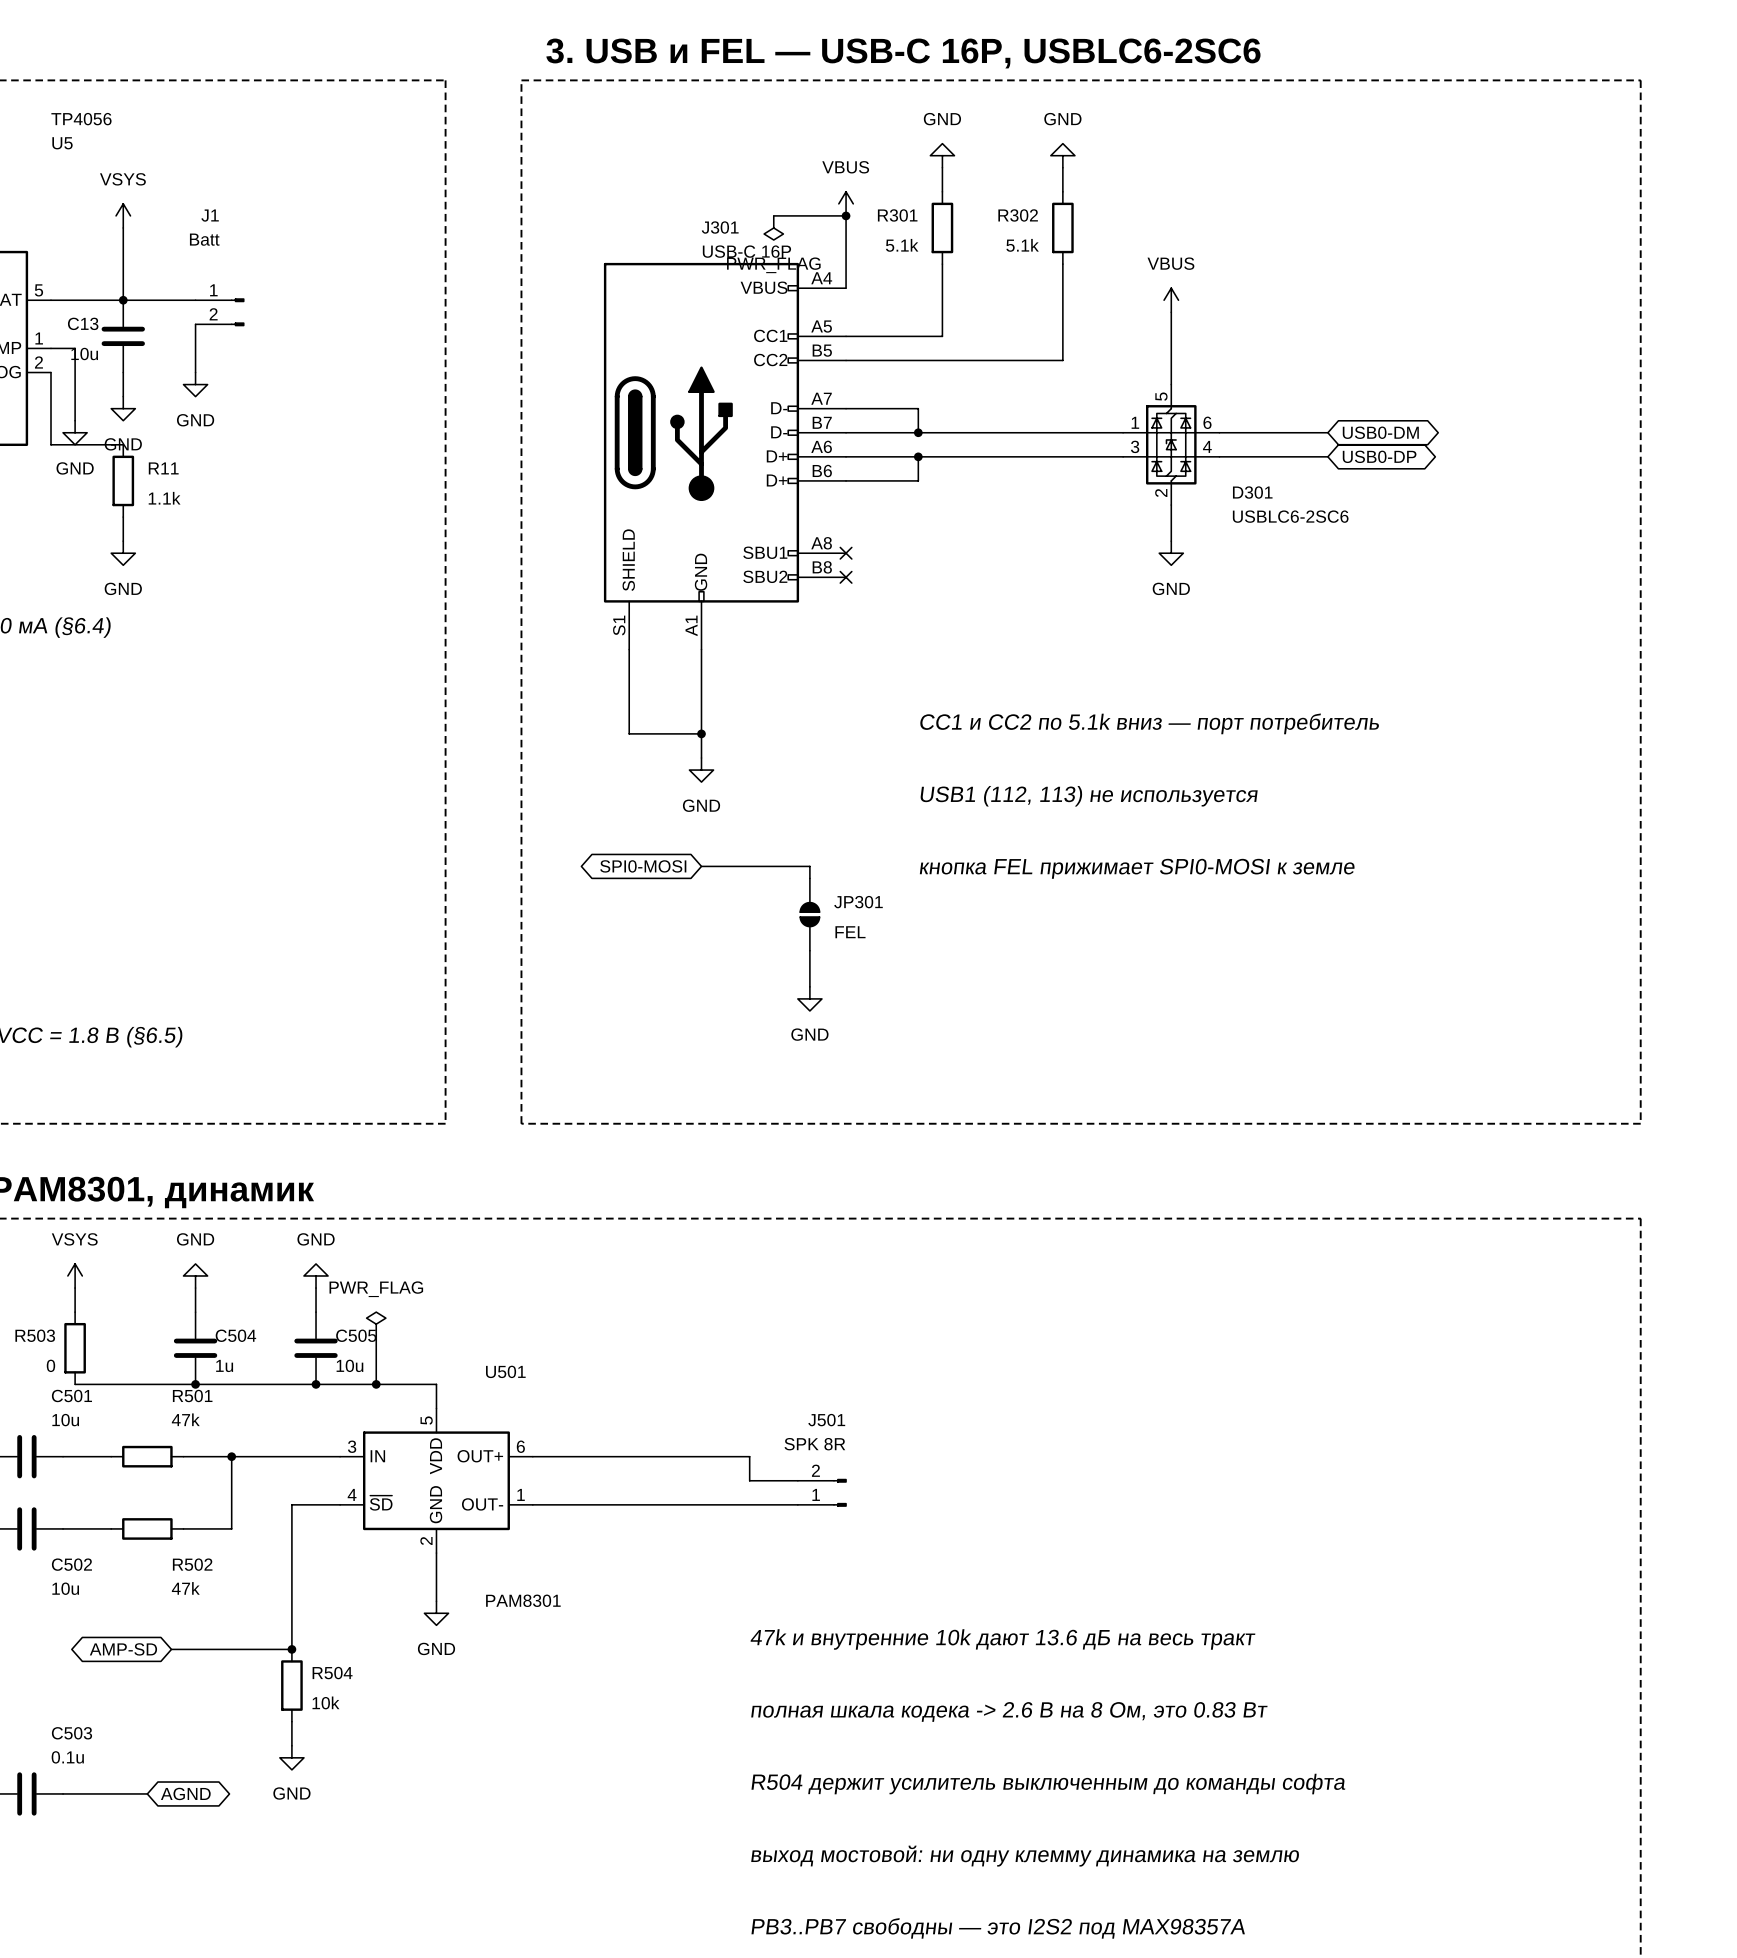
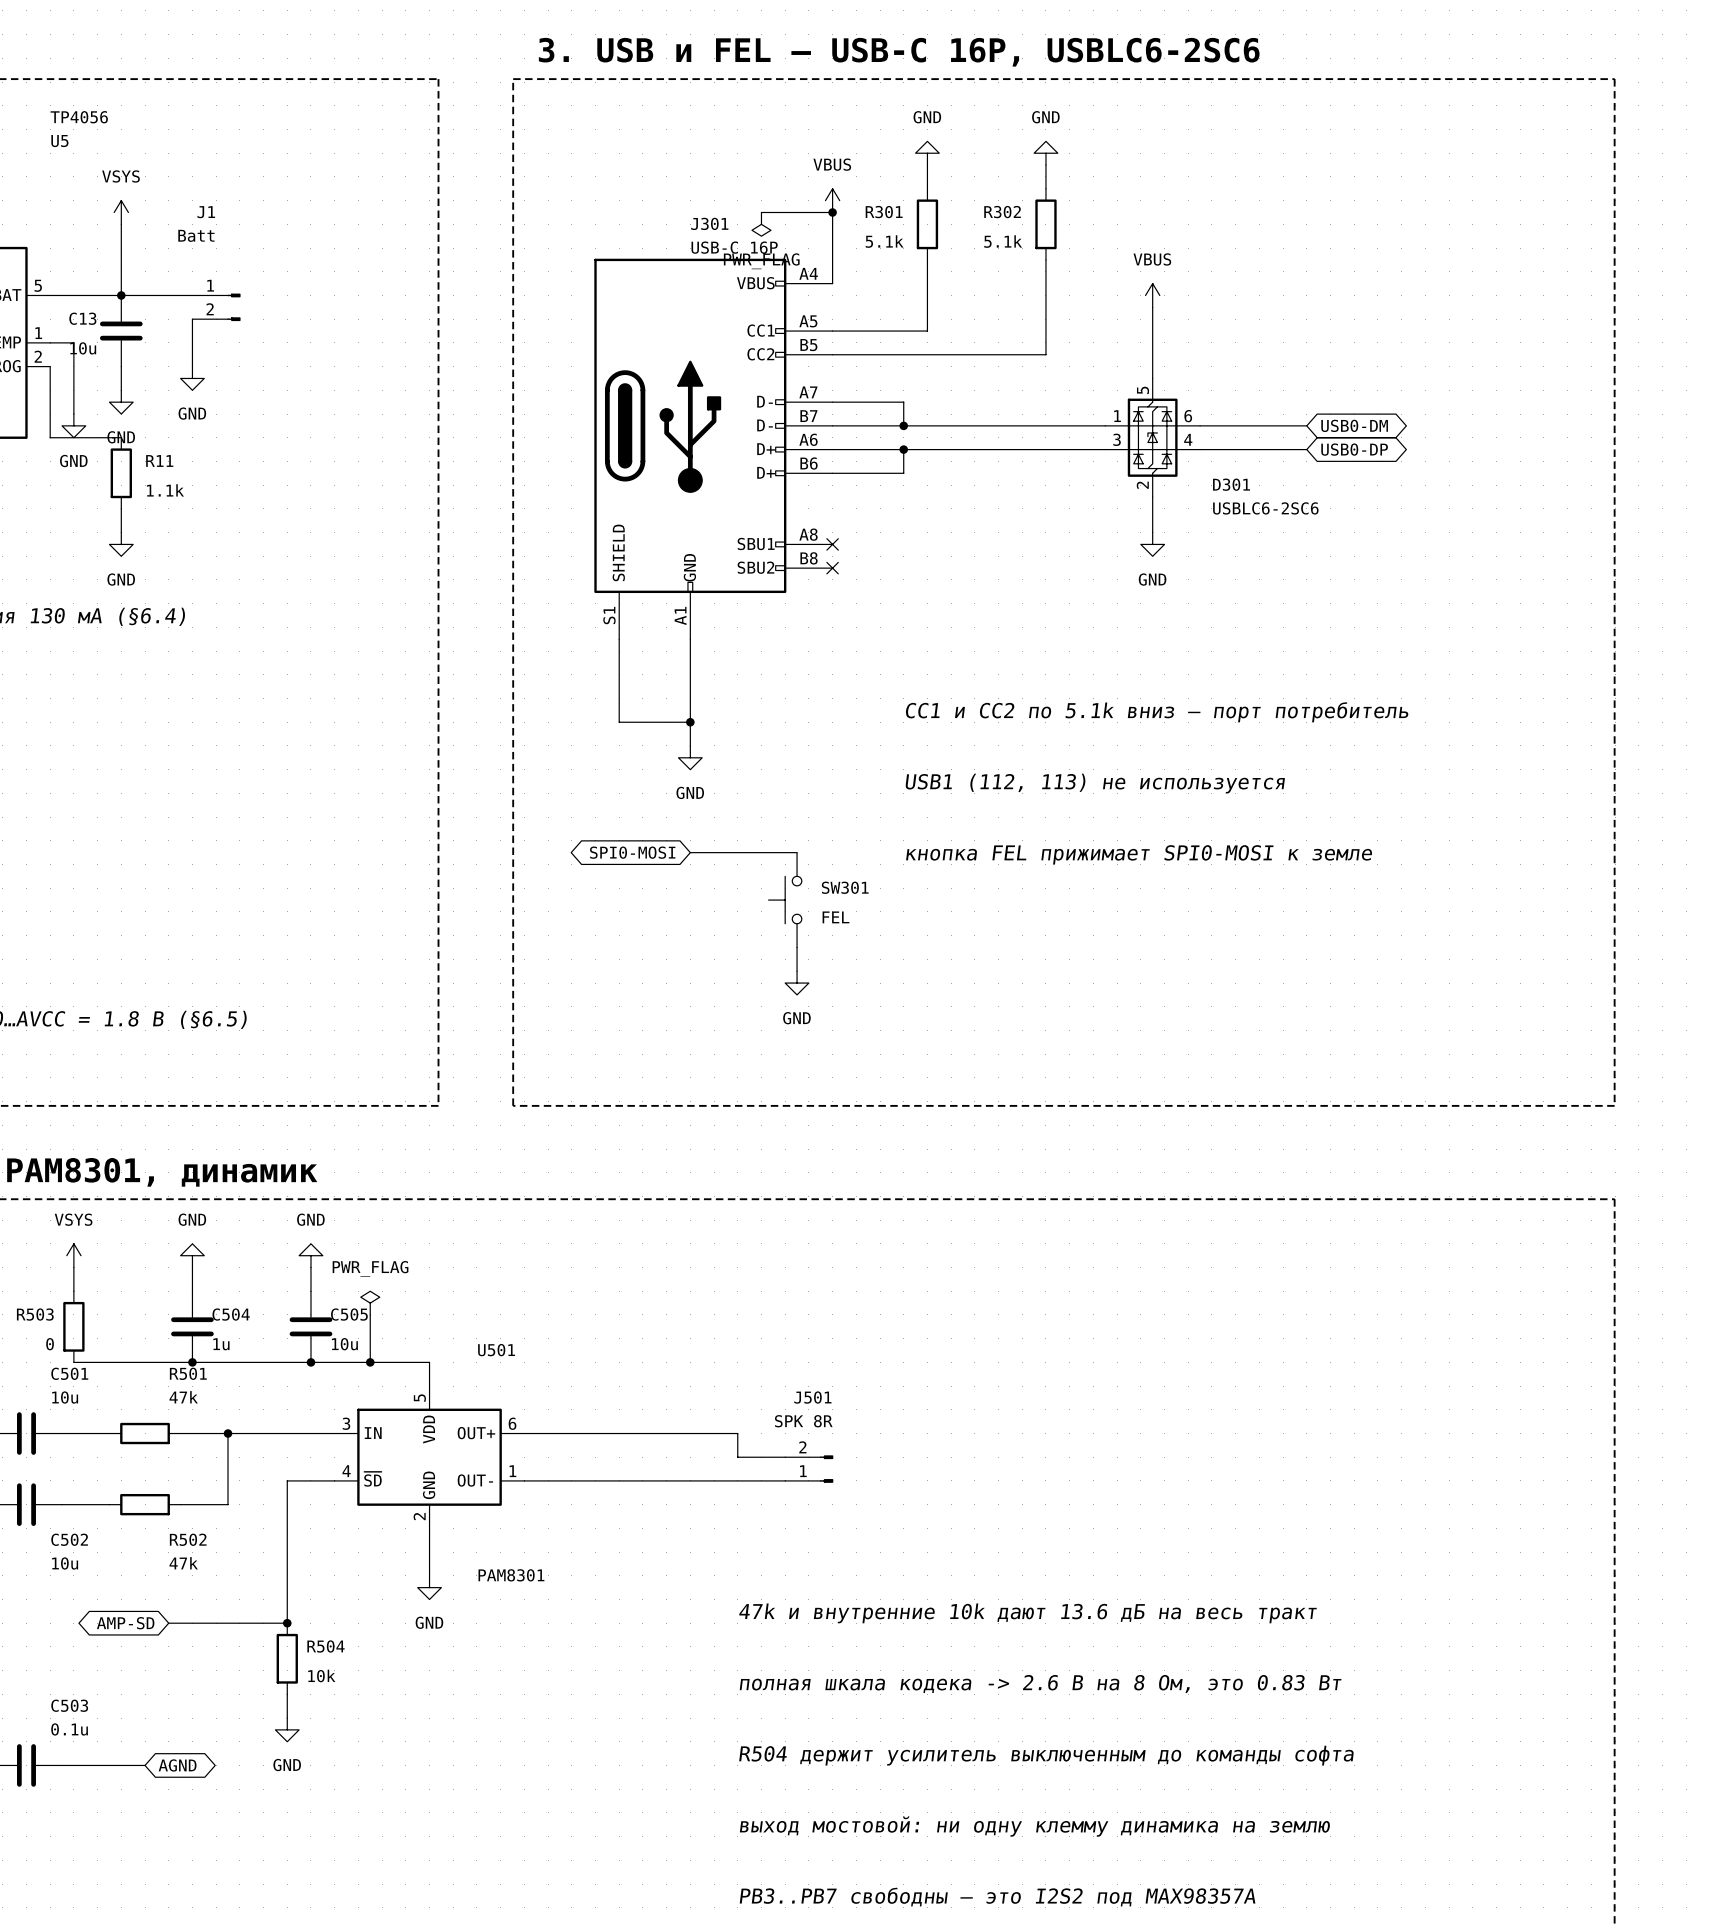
SW301: none -> FEL (785, 900)
JP301: FEL (809, 914) -> none

